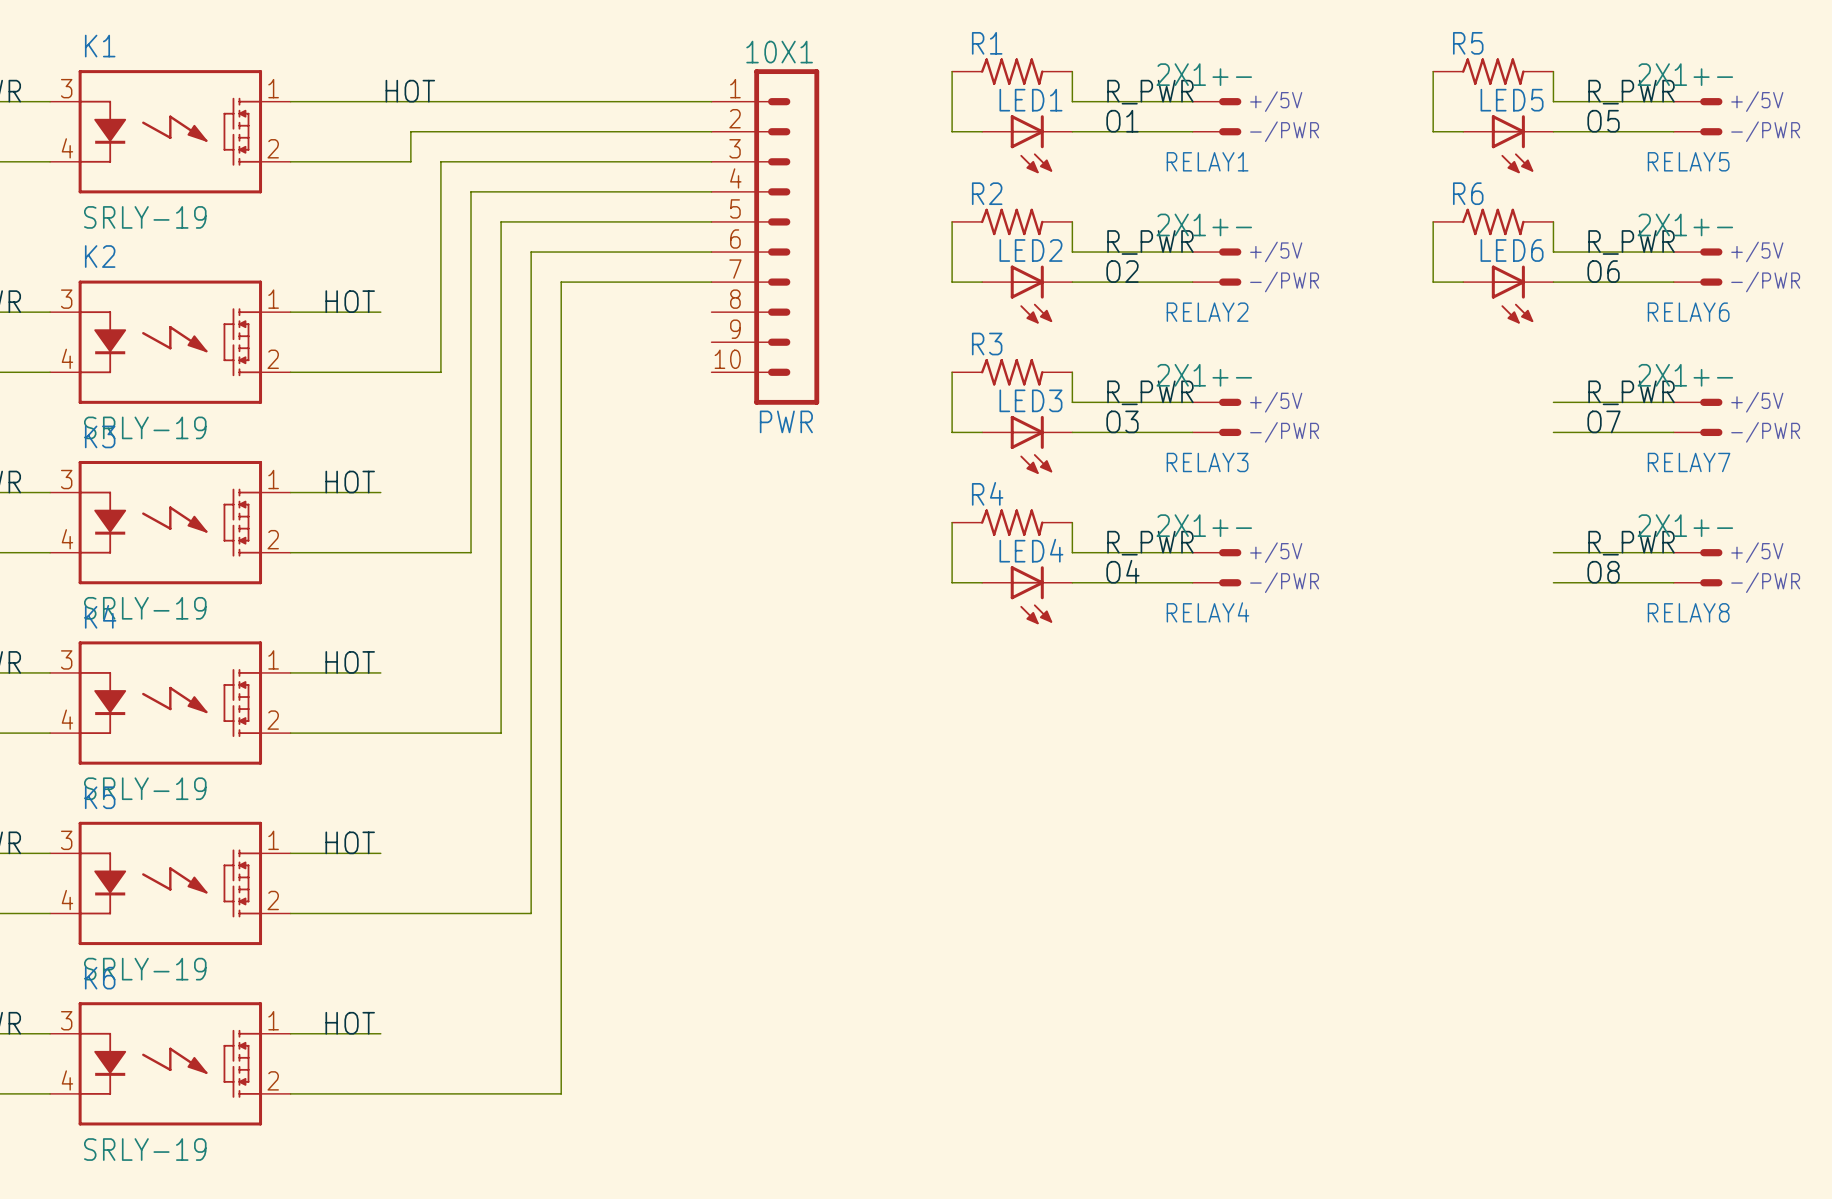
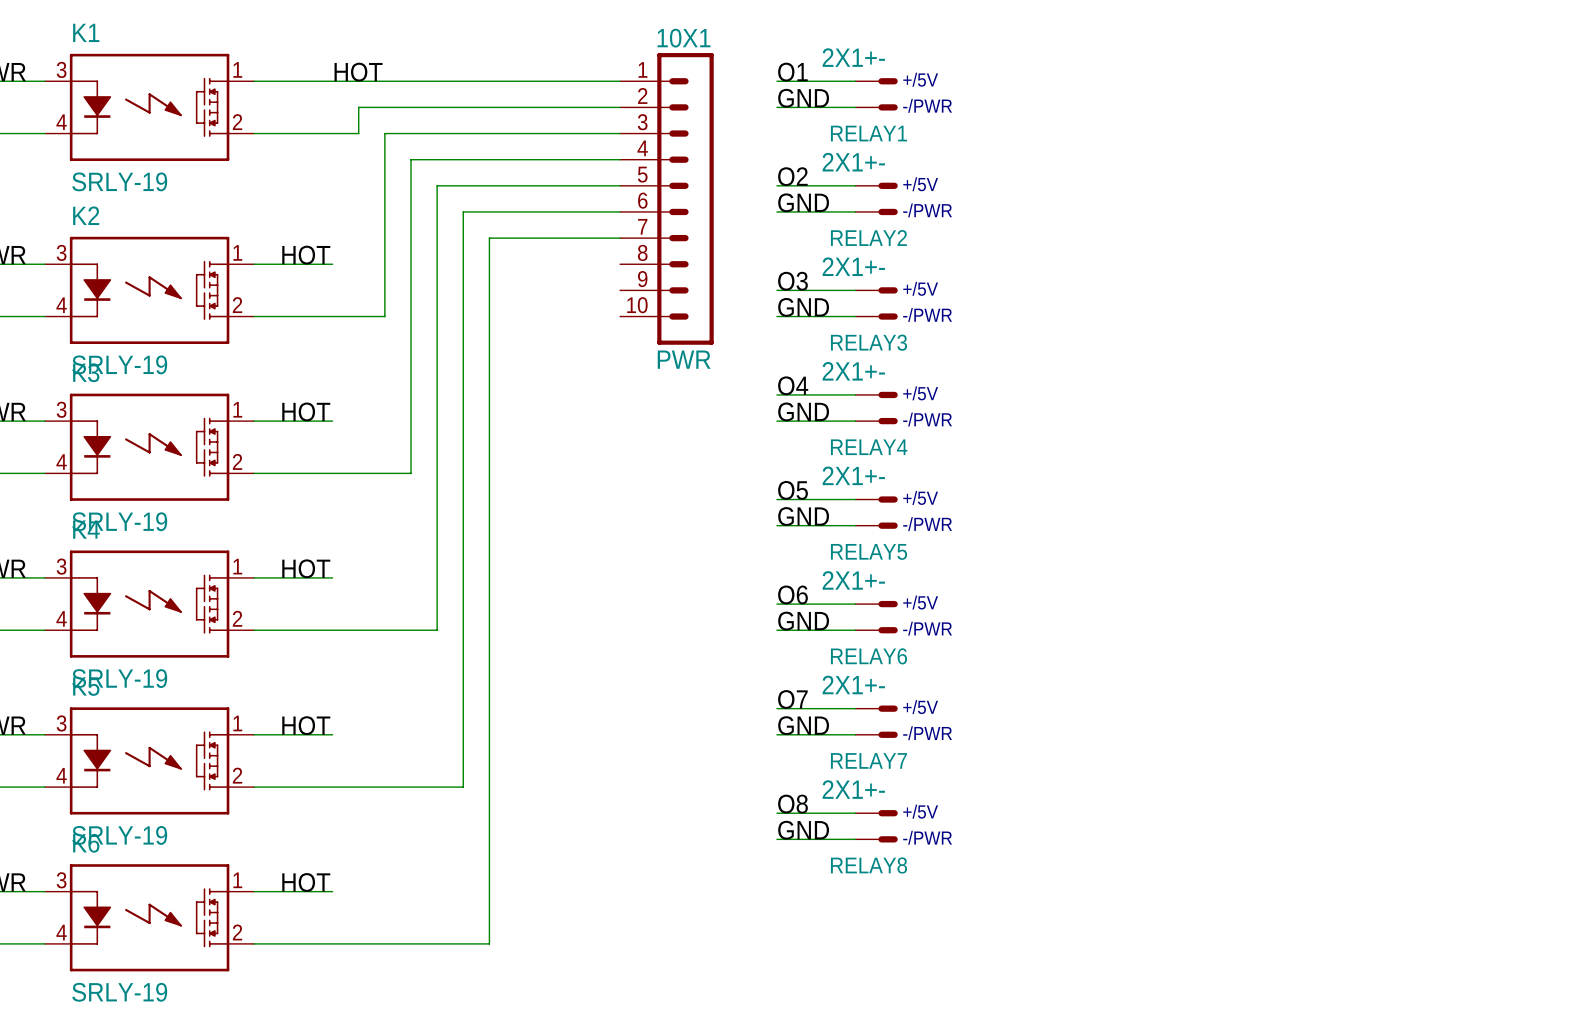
wire: (952, 71) (952, 131) -> (776, 107) (829, 107)
R1: (1012, 71) -> none
wire: (1072, 71) (1072, 101) (1192, 101) -> none
wire: (1433, 71) (1433, 131) (1463, 131) -> none
R5: (1493, 71) -> none
wire: (1553, 71) (1553, 101) (1673, 101) -> none
label: R_PWR (1150, 92) -> none
label: R_PWR (1631, 92) -> none
wire: none -> (776, 81) (855, 81)
RELAY1 position: (1216, 116) -> (876, 94)
RELAY5 position: (1698, 116) -> (876, 512)
label: none -> GND (803, 98)
label position: O1 (1122, 121) -> O1 (792, 72)
label: O5 (1603, 121) -> none
wire: (1072, 131) (1192, 131) -> none
wire: (1553, 131) (1673, 131) -> none
LED1: (1027, 144) -> none
LED5: (1508, 144) -> none
wire: none -> (776, 185) (855, 185)
wire: (952, 221) (952, 282) (982, 282) -> none
R2: (1012, 221) -> none
wire: (1072, 221) (1072, 252) (1192, 252) -> none
wire: (1433, 221) (1433, 282) (1463, 282) -> none
R6: (1493, 221) -> none
wire: (1553, 221) (1553, 252) (1673, 252) -> none
label: none -> GND (803, 202)
label: R_PWR (1150, 242) -> none
label: R_PWR (1631, 242) -> none
wire: none -> (776, 211) (855, 211)
RELAY2 position: (1216, 267) -> (876, 198)
RELAY6 position: (1698, 267) -> (876, 617)
label position: O2 (1122, 271) -> O2 (792, 176)
label: O6 (1603, 271) -> none
wire: (1072, 282) (1192, 282) -> none
wire: (1553, 282) (1673, 282) -> none
LED2: (1027, 294) -> none
LED6: (1508, 294) -> none
wire: none -> (776, 290) (855, 290)
label: none -> GND (803, 307)
wire: none -> (776, 316) (855, 316)
wire: (952, 372) (952, 432) (982, 432) -> none
R3: (1012, 372) -> none
wire: (1072, 372) (1072, 402) (1192, 402) -> none
label: R_PWR (1150, 392) -> none
label: R_PWR (1631, 392) -> none
wire: (1553, 402) (1673, 402) -> none
RELAY3 position: (1216, 417) -> (876, 303)
RELAY7 position: (1698, 417) -> (876, 721)
label position: O3 (1122, 421) -> O3 (792, 281)
label: O7 (1604, 421) -> none
wire: (1072, 432) (1192, 432) -> none
wire: (1553, 432) (1673, 432) -> none
LED3: (1027, 444) -> none
wire: none -> (776, 394) (855, 394)
label: none -> GND (803, 411)
wire: none -> (776, 421) (855, 421)
wire: (952, 522) (952, 582) -> (776, 499) (829, 499)
R4: (1012, 522) -> none
wire: (1072, 522) (1072, 552) (1192, 552) -> none
label: R_PWR (1150, 543) -> none
label: R_PWR (1631, 543) -> none
wire: (1553, 552) (1673, 552) -> none
RELAY4 position: (1216, 567) -> (876, 408)
RELAY8 position: (1698, 567) -> (876, 826)
label position: O4 (1122, 571) -> O4 (793, 385)
label: none -> O5 (793, 490)
label: O8 (1603, 572) -> none
wire: (1072, 582) (1192, 582) -> none
wire: (1553, 582) (1673, 582) -> none
LED4: (1027, 595) -> none
label: none -> GND (803, 516)
wire: none -> (776, 525) (855, 525)
label: none -> O6 (792, 594)
wire: none -> (776, 604) (855, 604)
label: none -> GND (803, 621)
wire: none -> (776, 630) (855, 630)
label: none -> O7 (792, 699)
wire: none -> (776, 708) (855, 708)
label: none -> GND (803, 725)
wire: none -> (776, 734) (855, 734)
label: none -> O8 (792, 804)
wire: none -> (776, 813) (855, 813)
label: none -> GND (803, 830)
wire: none -> (776, 839) (855, 839)

